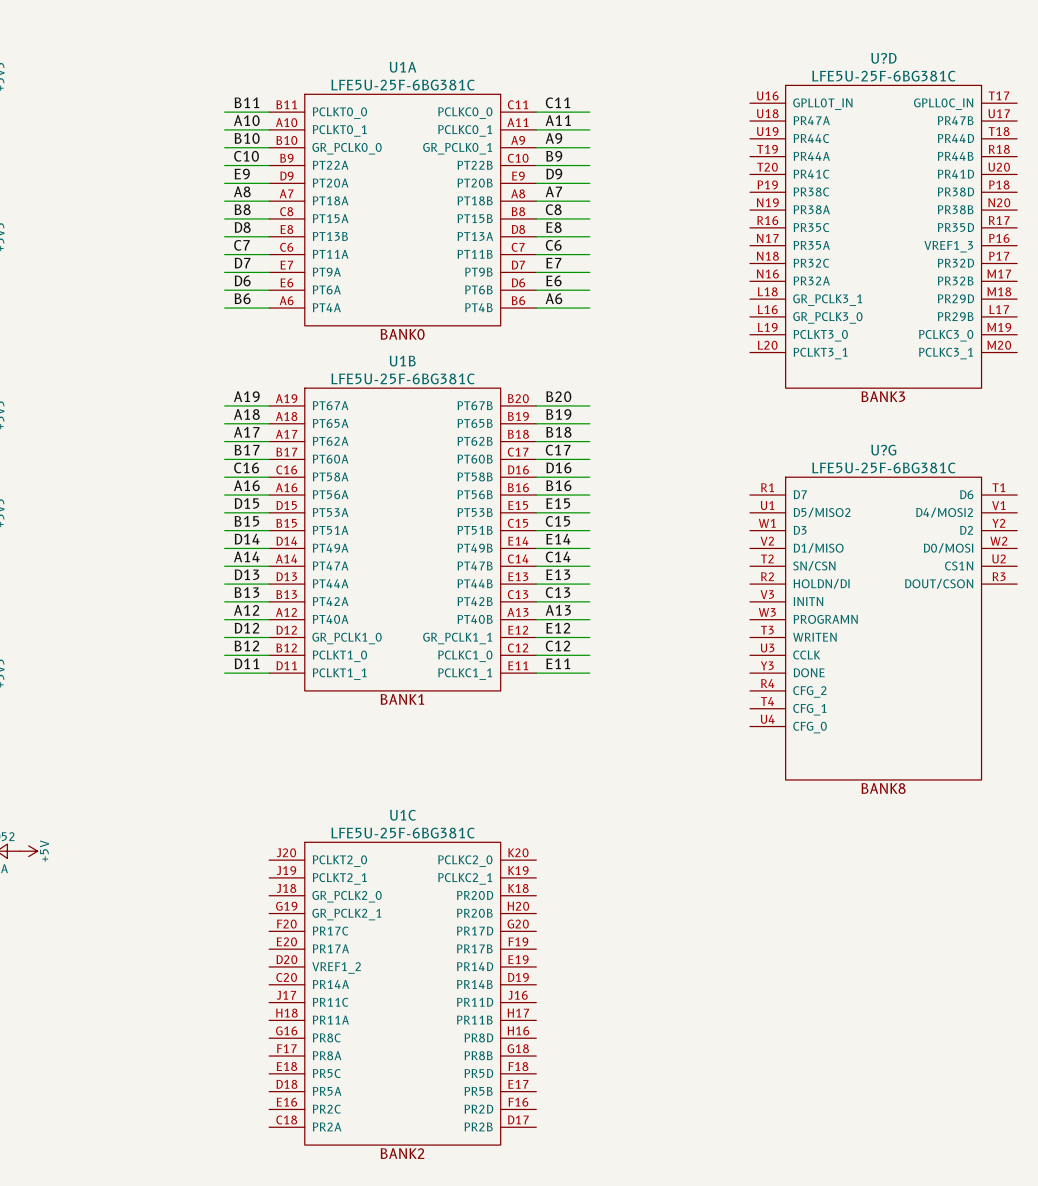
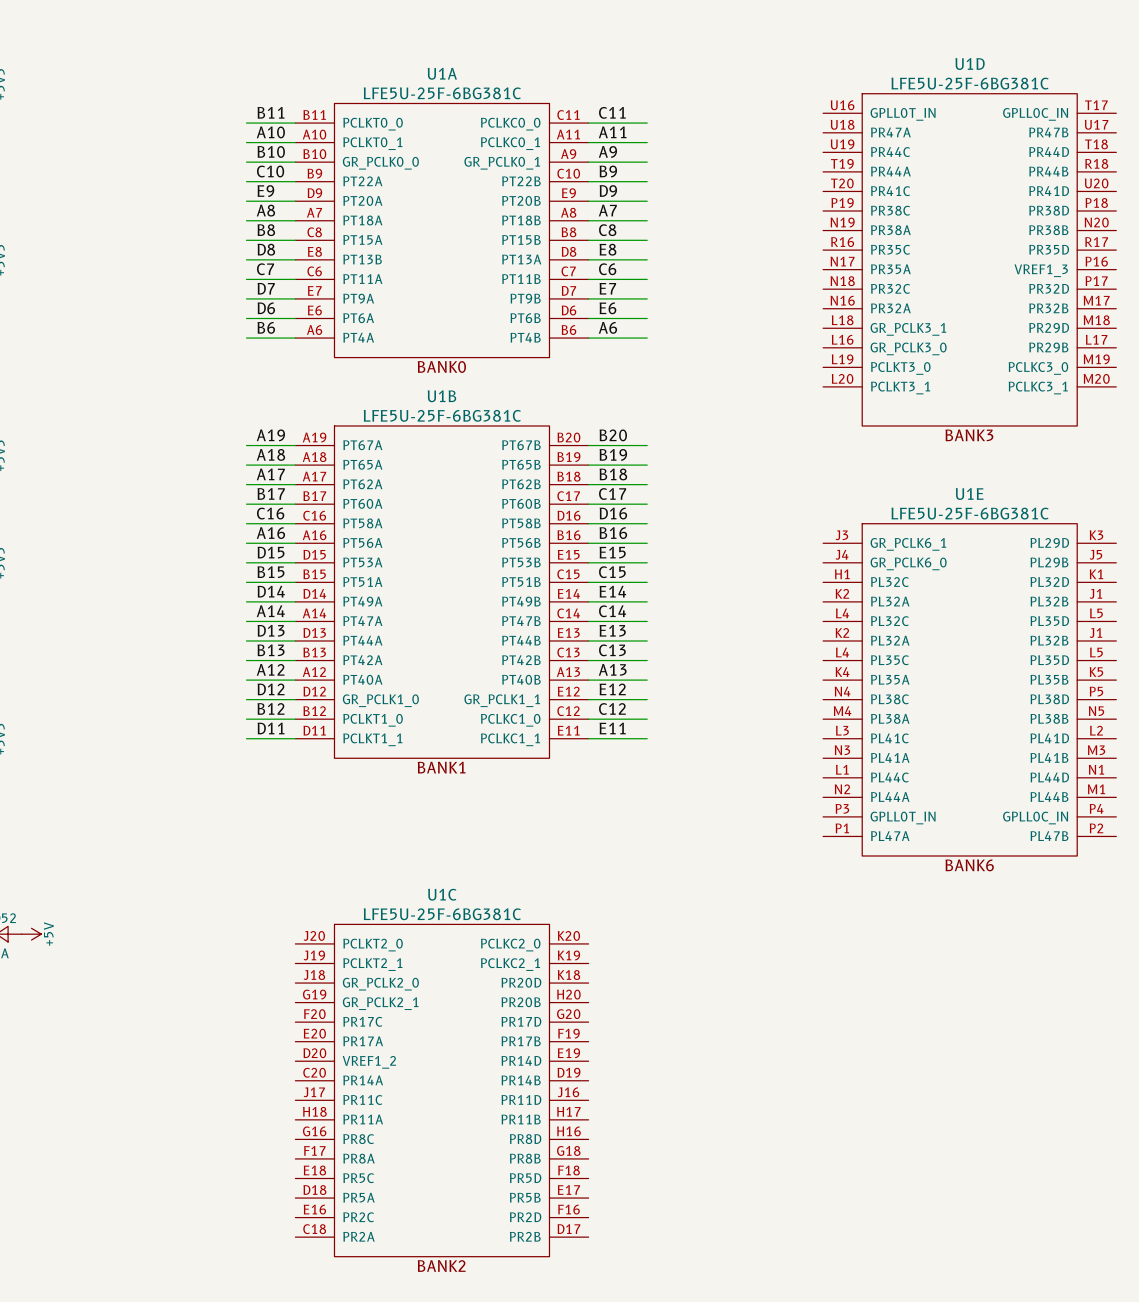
U?D name: U?D (883, 58) -> U1D (970, 64)
U?G: LFE5U-25F-6BG381C (883, 628) -> none
U1E: none -> LFE5U-25F-6BG381C (969, 689)

